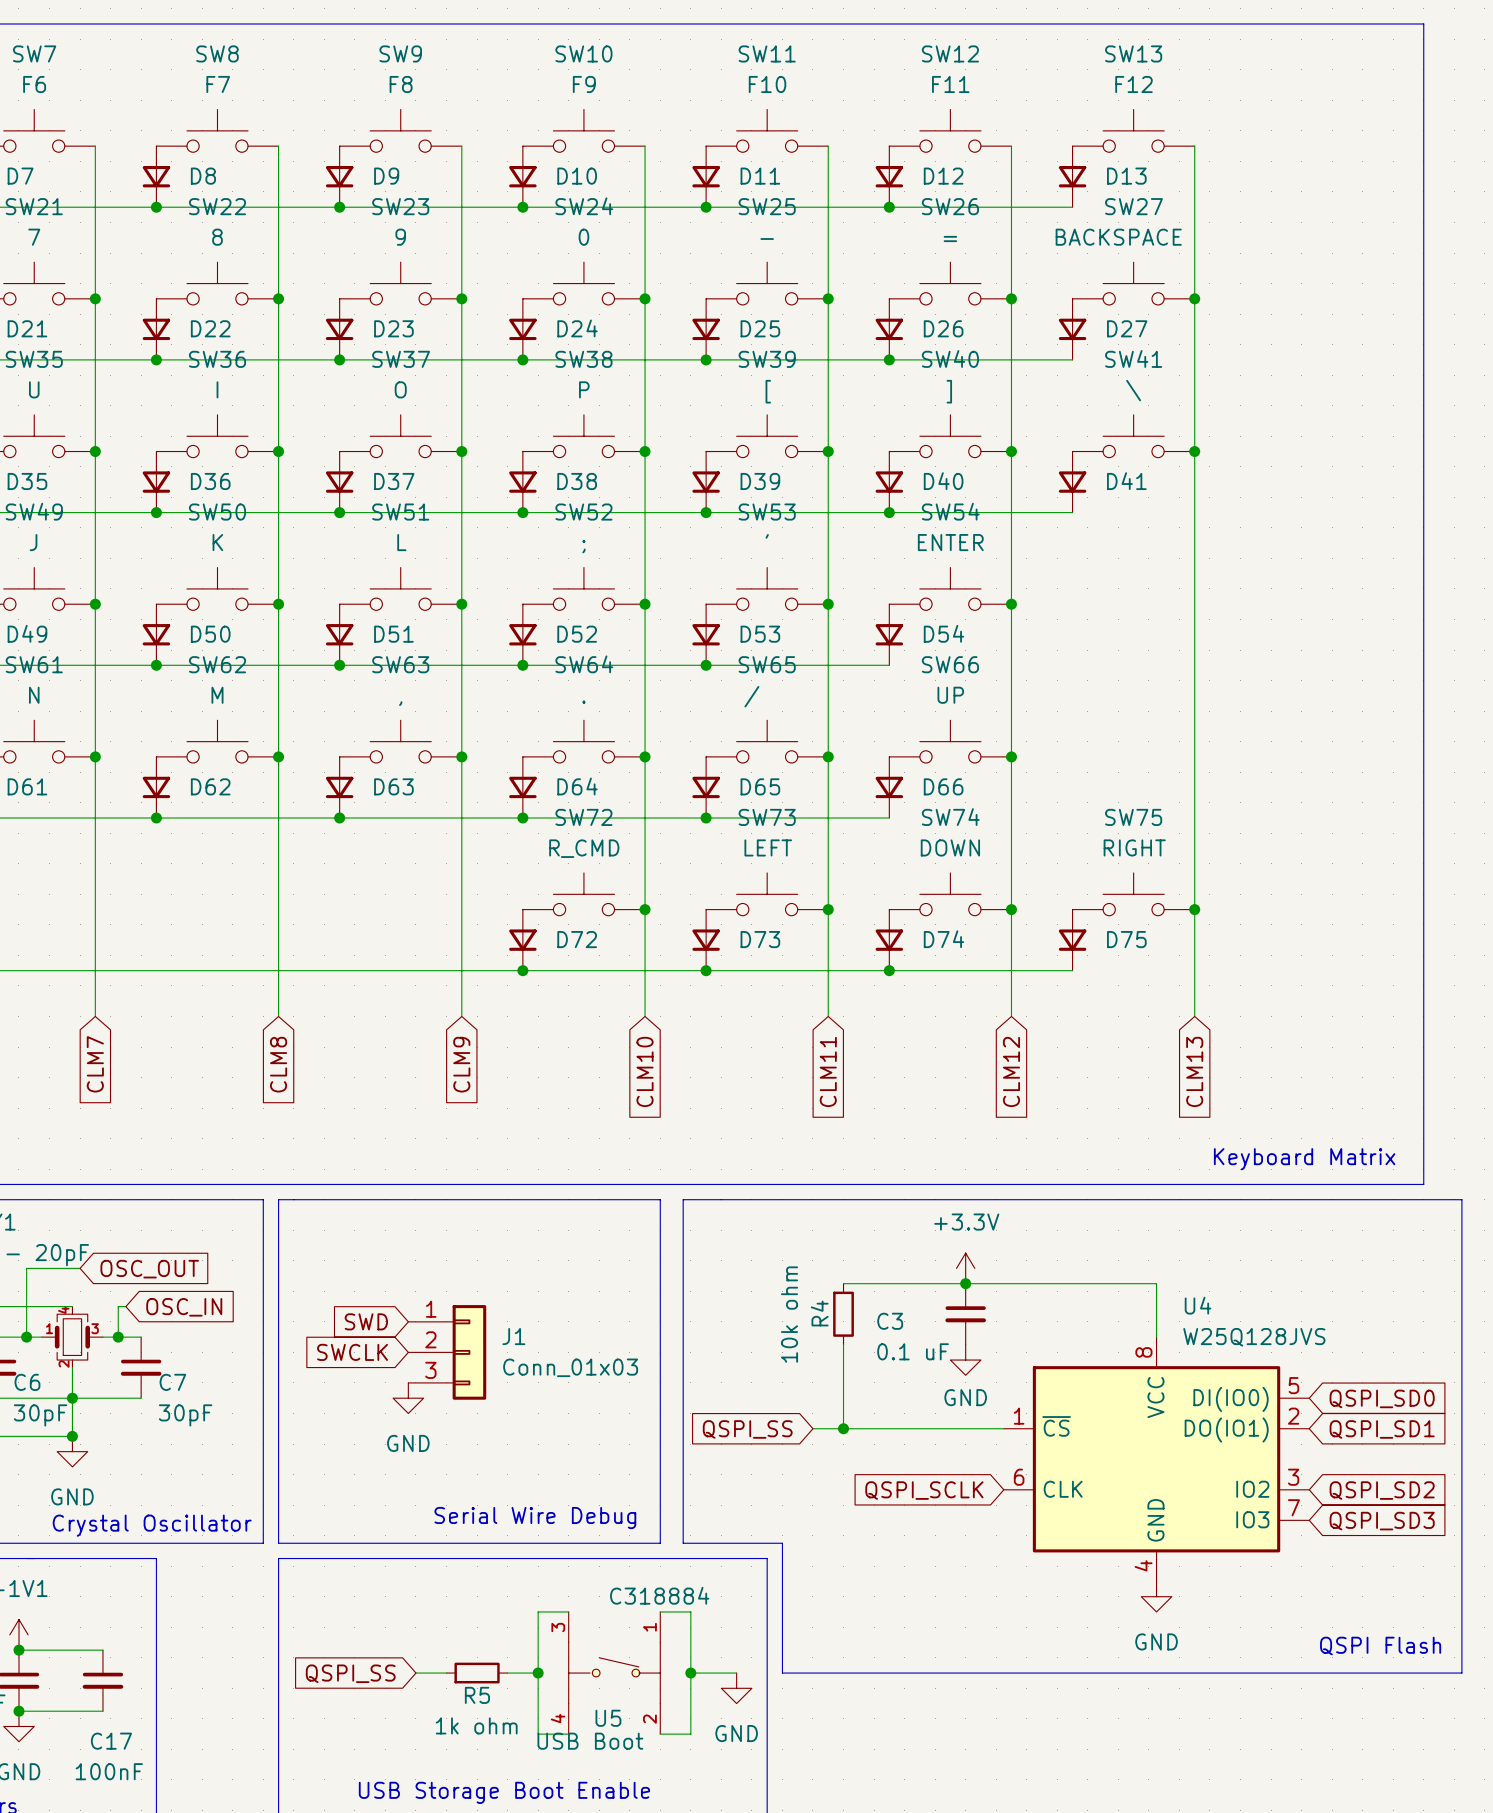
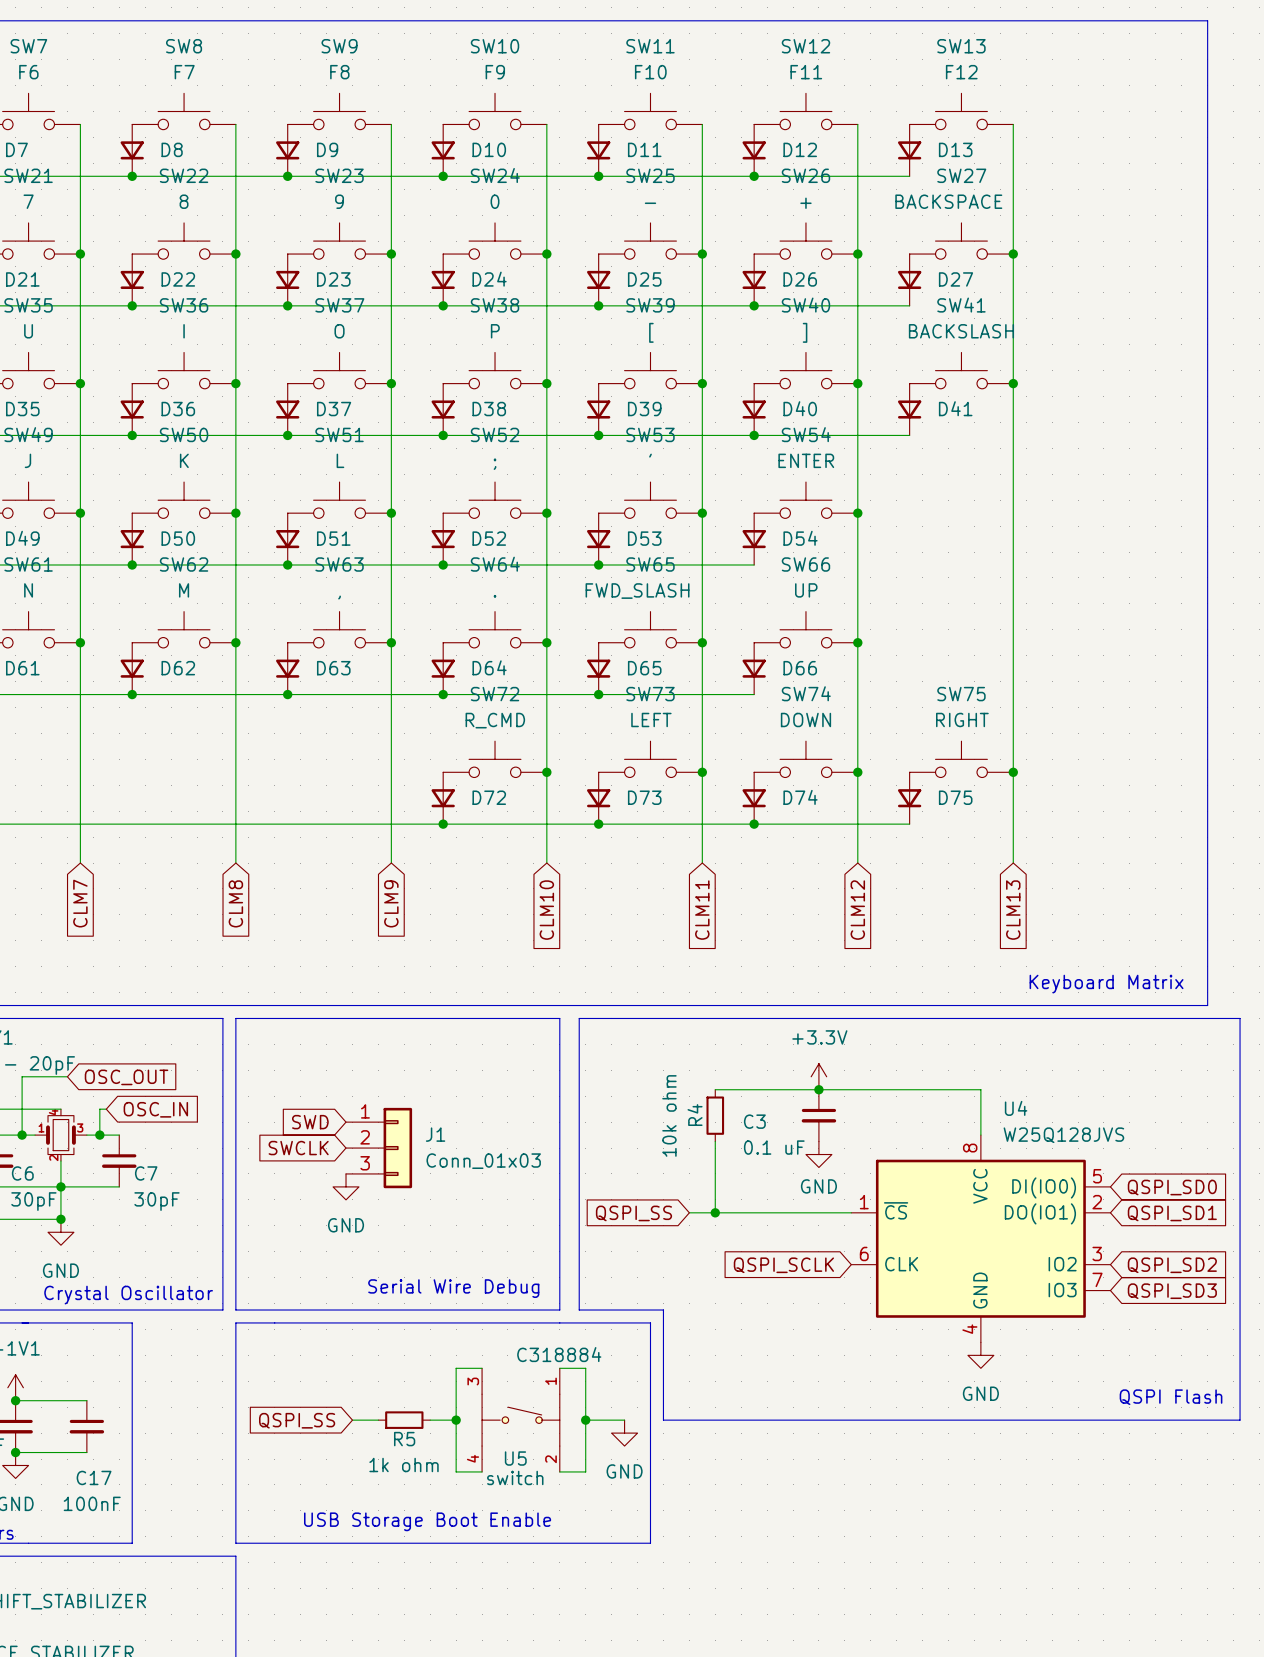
SW26 value: = (950, 239) -> + (805, 203)
SW41 value: \ (1133, 390) -> BACKSLASH (961, 331)
SW65 value: / (751, 696) -> FWD_SLASH (637, 591)
U5 value: USB Boot (590, 1741) -> switch (515, 1477)

